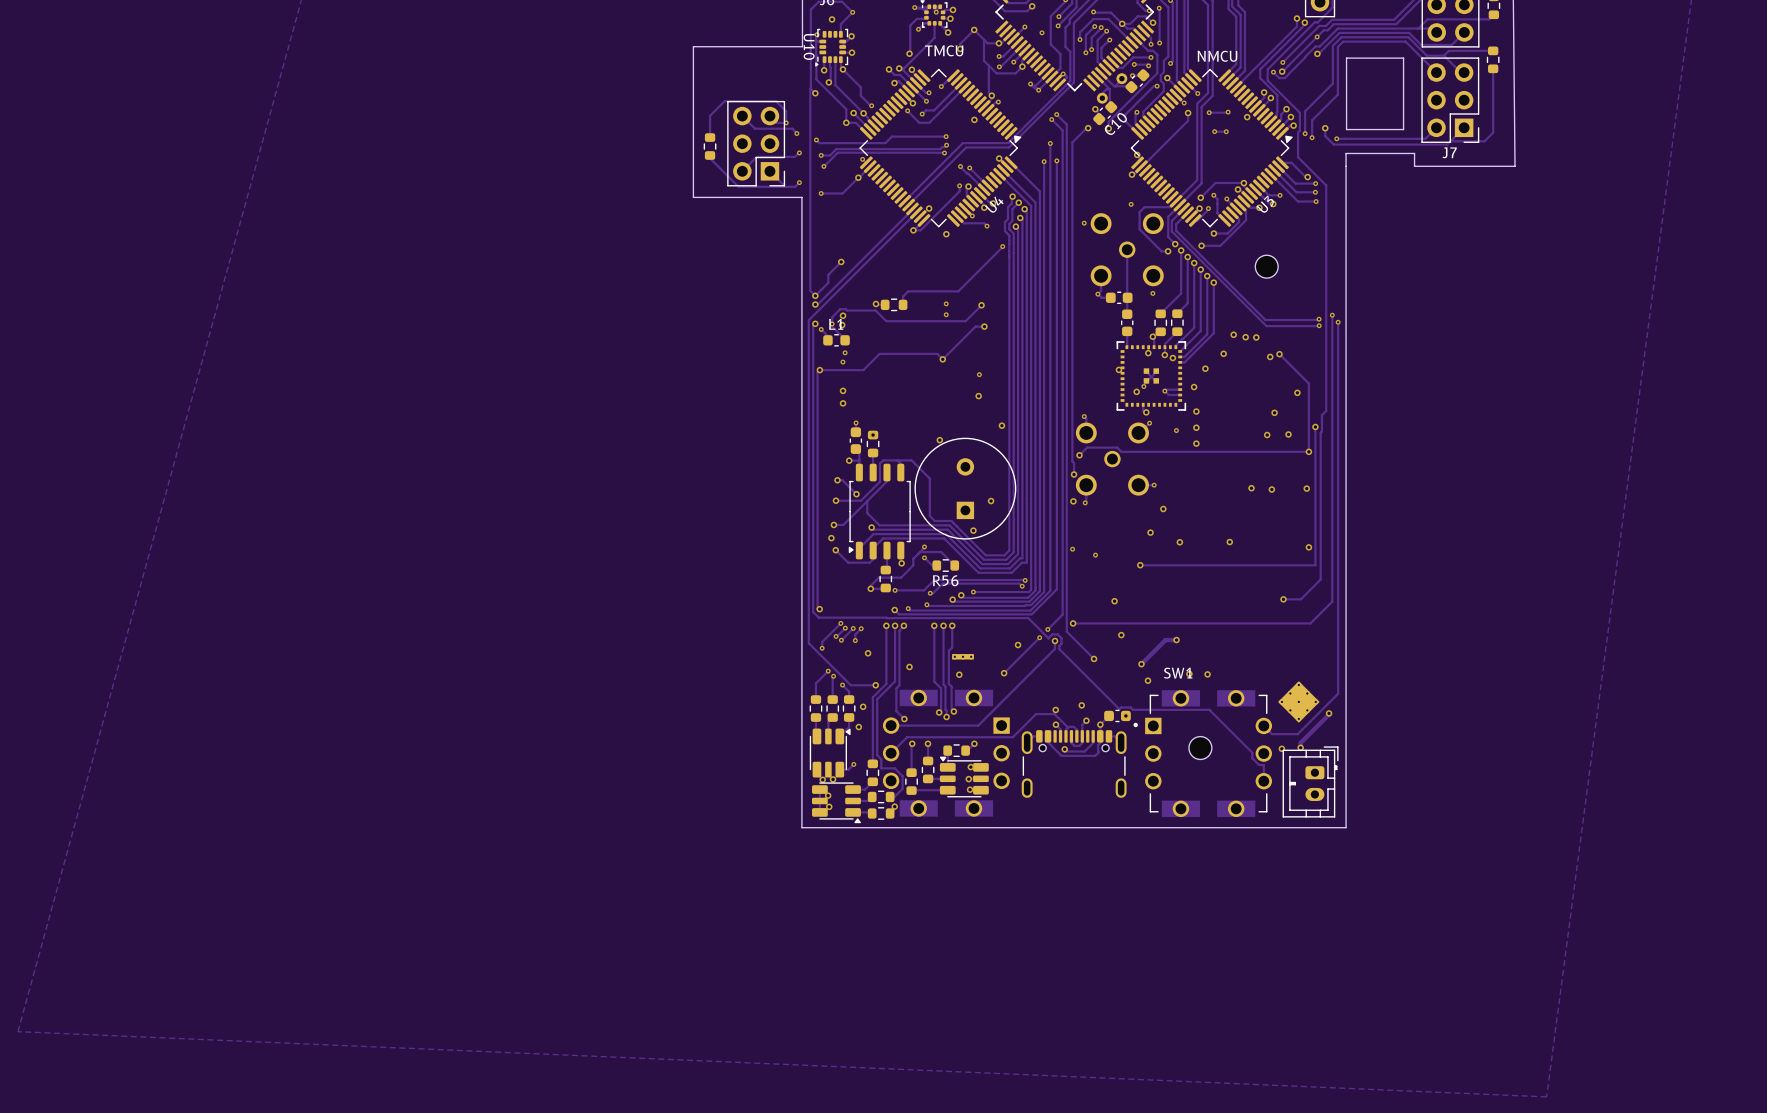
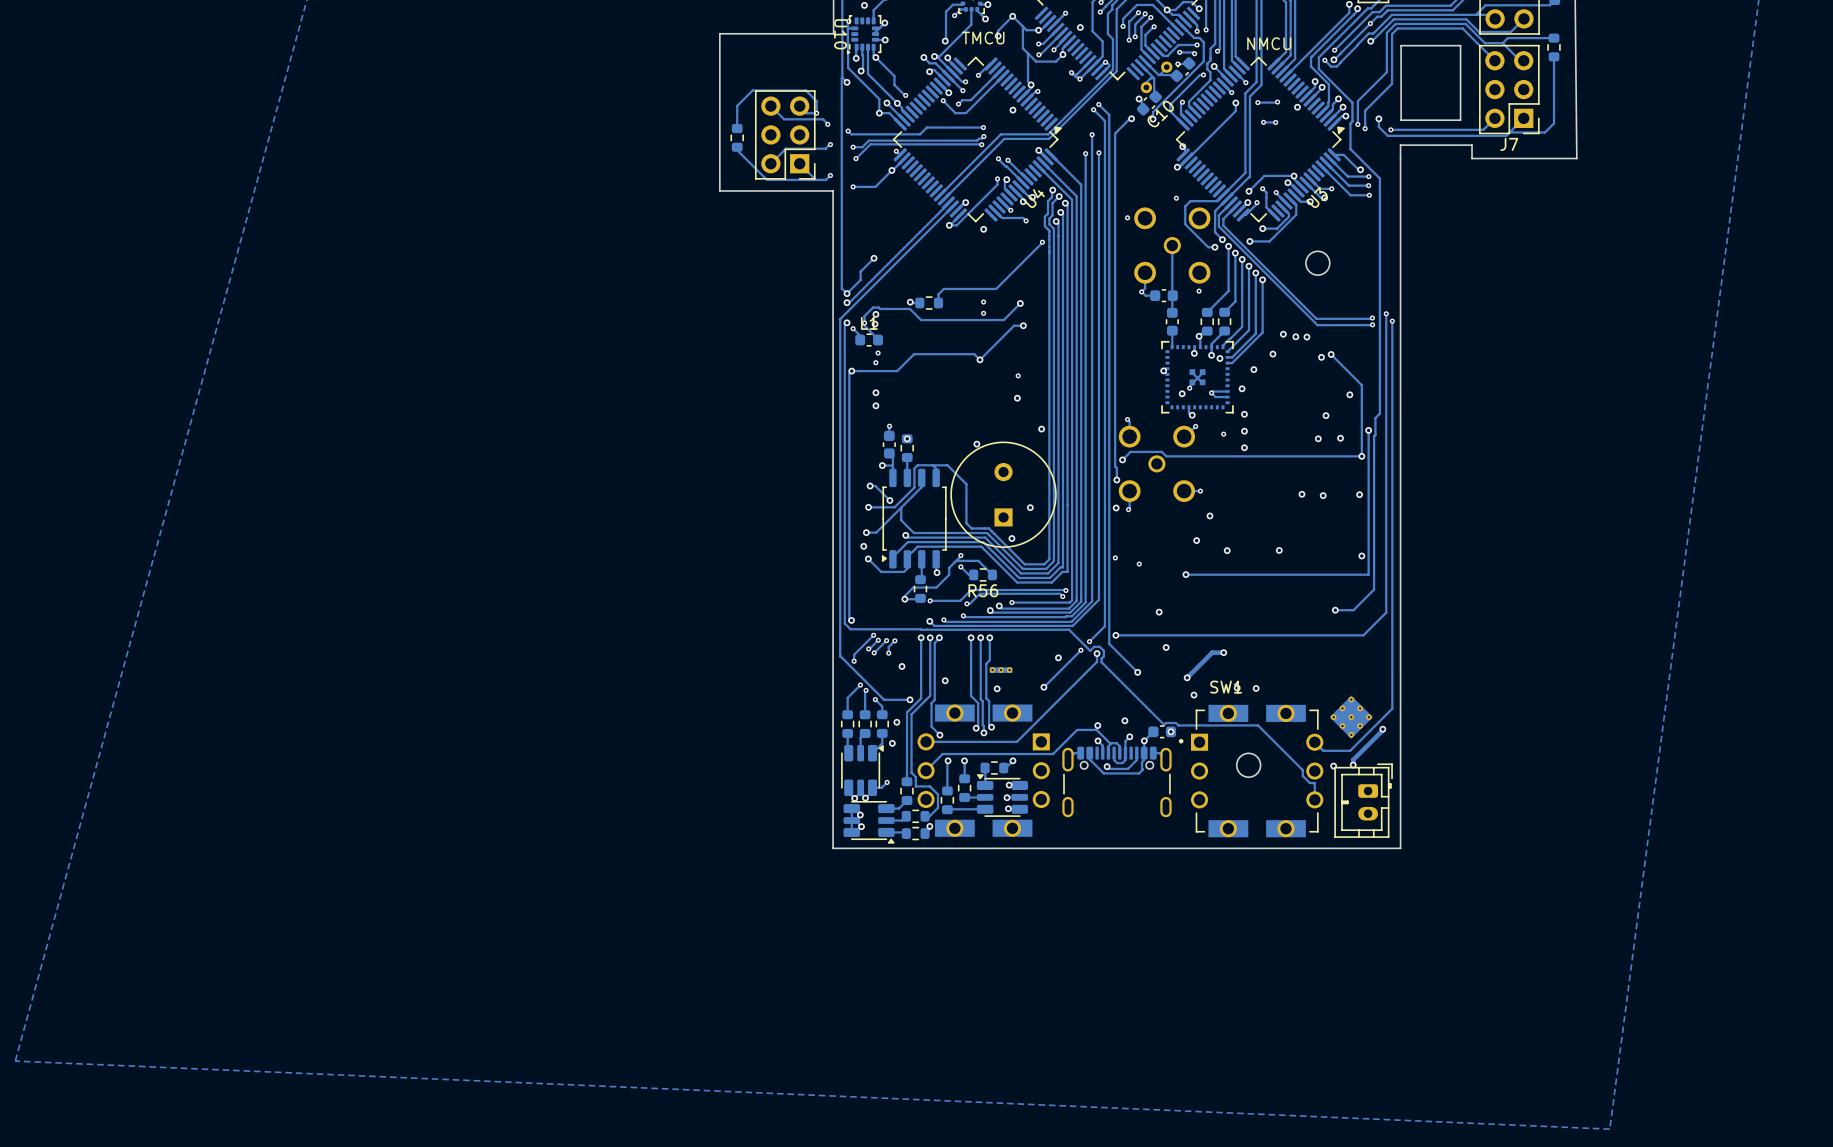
via: (1041, 32) -> none
via: none -> (1080, 27)

